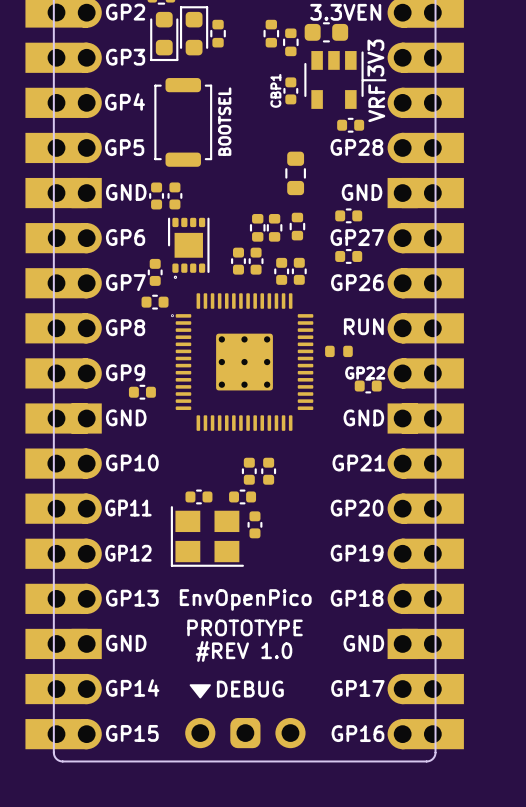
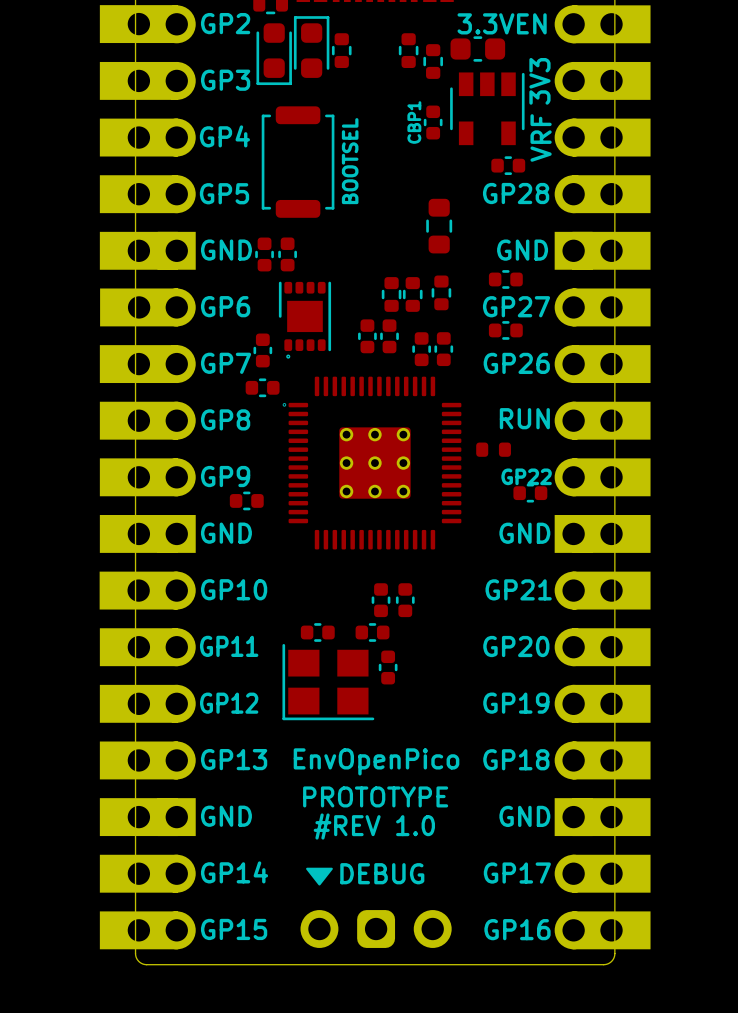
line: (362, 80) (385, 80) -> none

